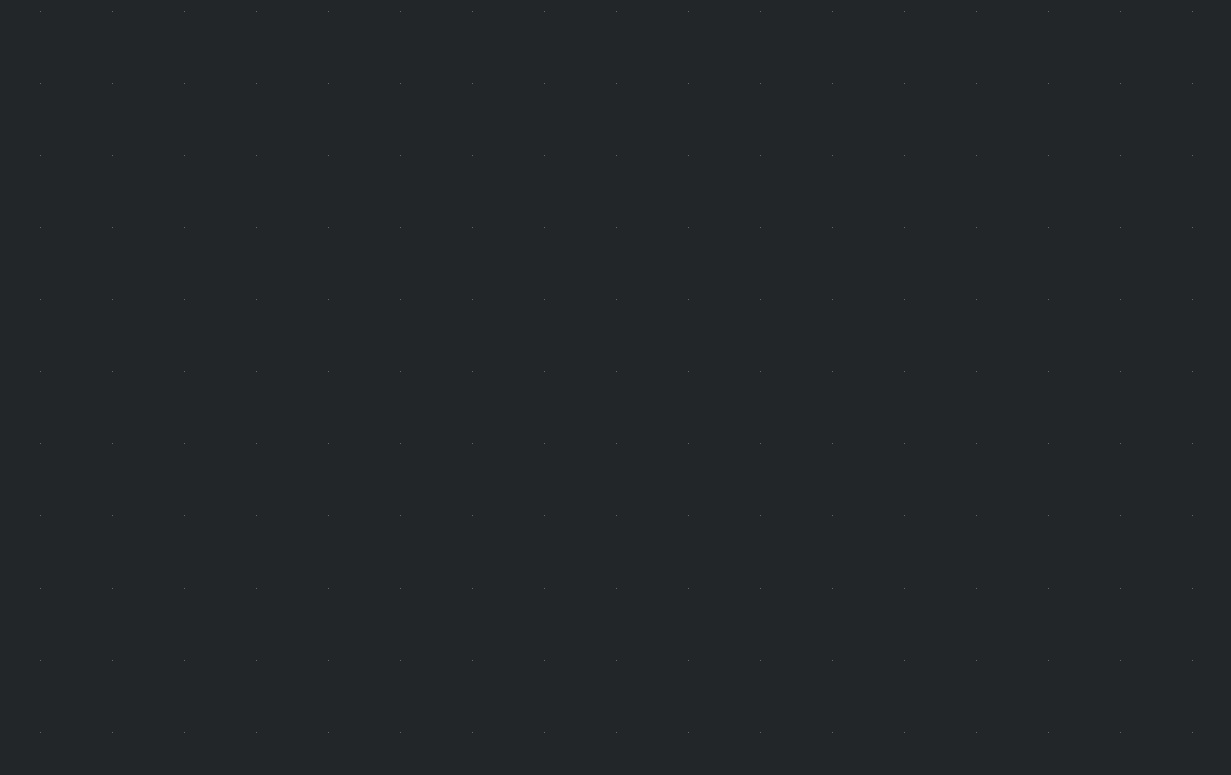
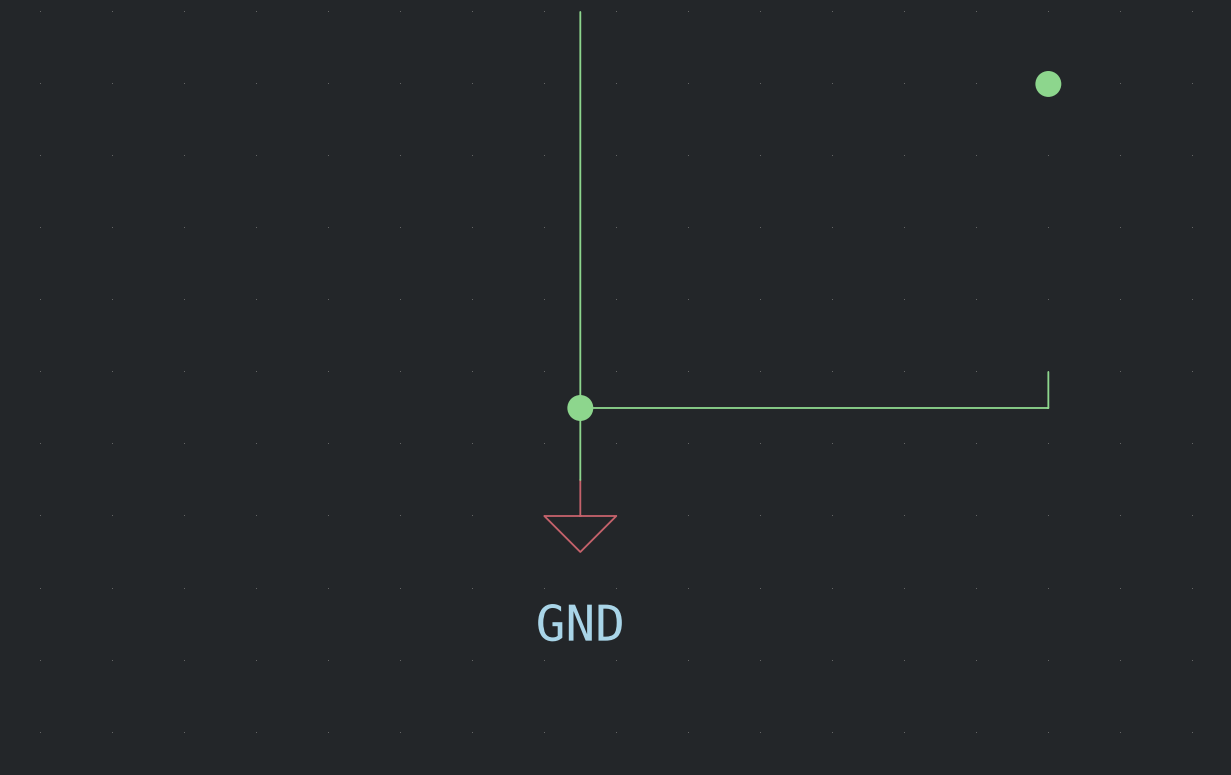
wire: none -> (580, 11) (580, 479)
junction: none -> (1048, 83)
wire: none -> (1048, 371) (1048, 407) (580, 407)
junction: none -> (580, 407)
power symbol: none -> GND (580, 515)

